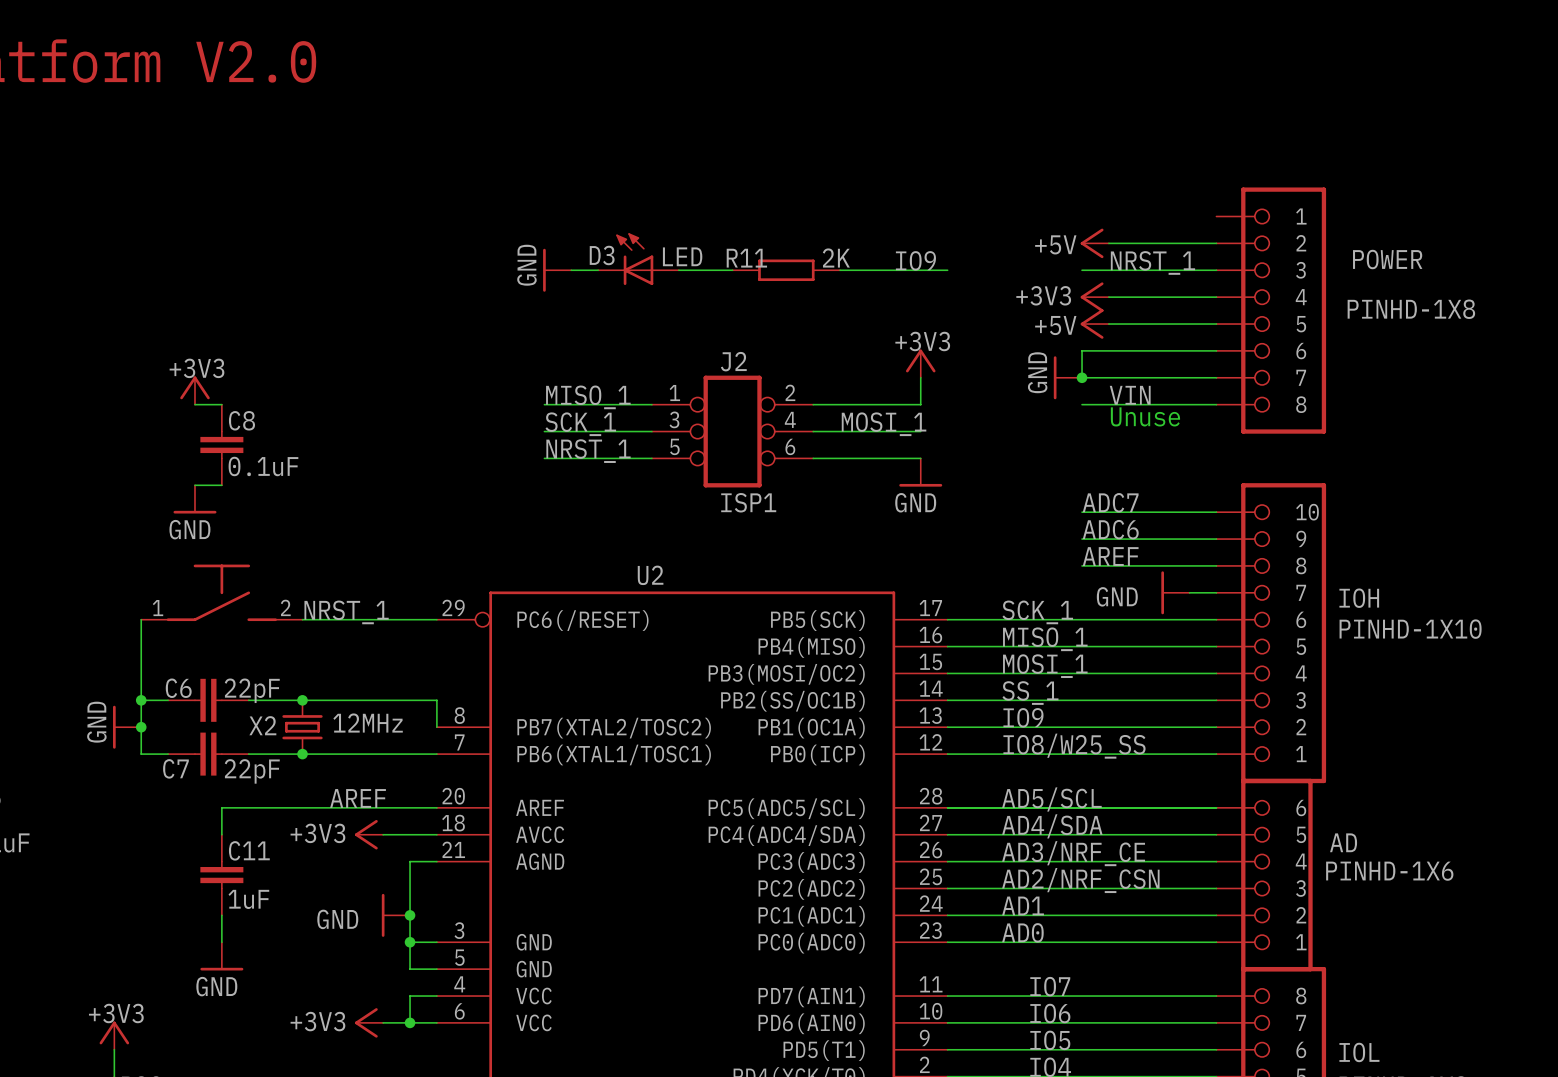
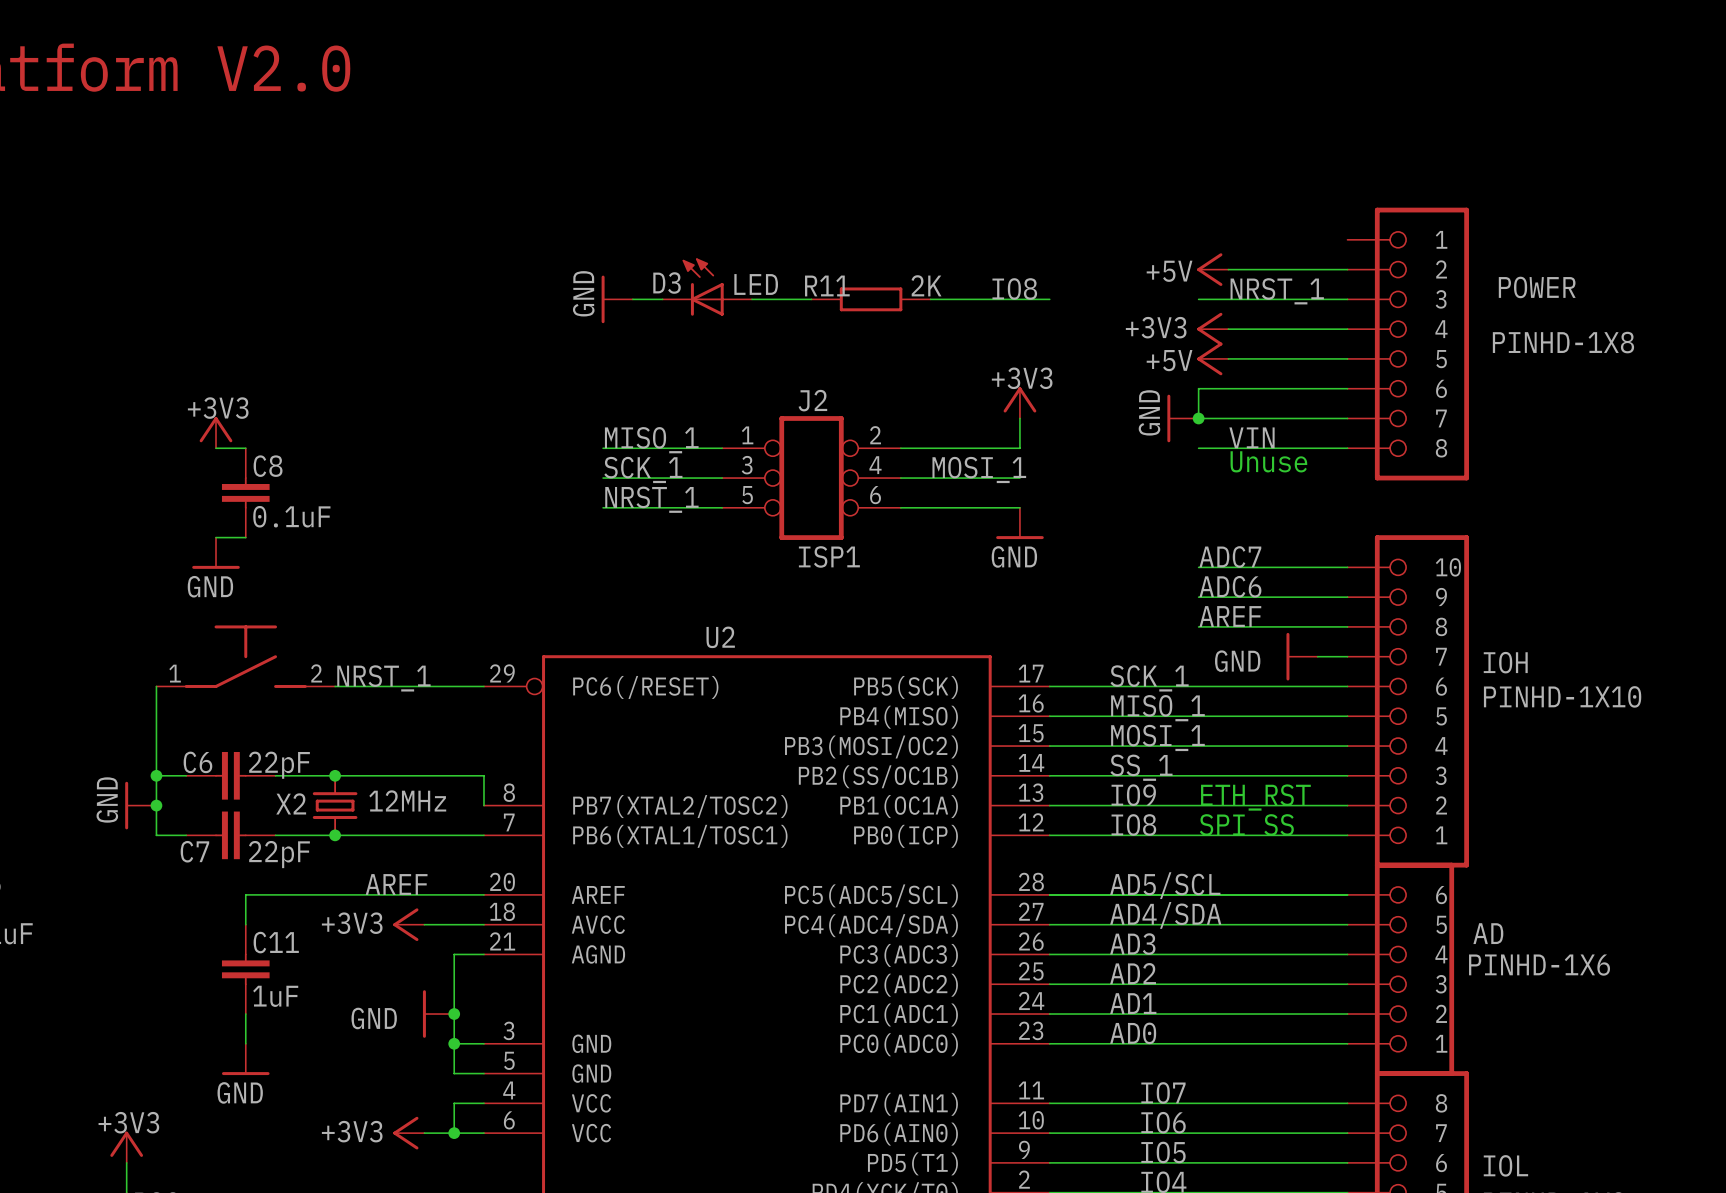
label: IO9 (915, 260) -> IO8 (1014, 288)
text: none -> ETH_RST (1255, 797)
text: none -> SPI SS (1246, 824)
label: IO8/W25_SS (1074, 746) -> IO8 (1133, 824)
label: AD3/NRF_CE (1073, 853) -> AD3 (1132, 944)
label: AD2/NRF_CSN (1080, 880) -> AD2 (1133, 973)

